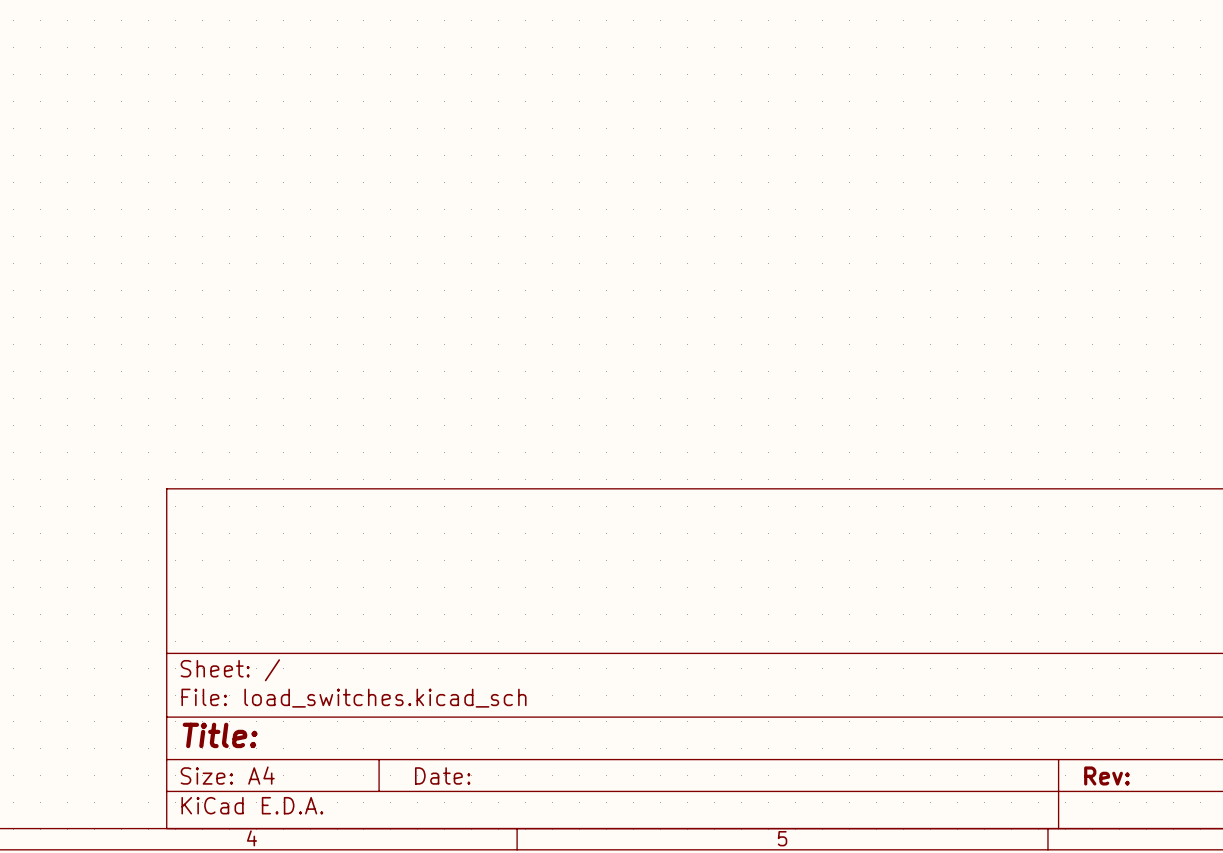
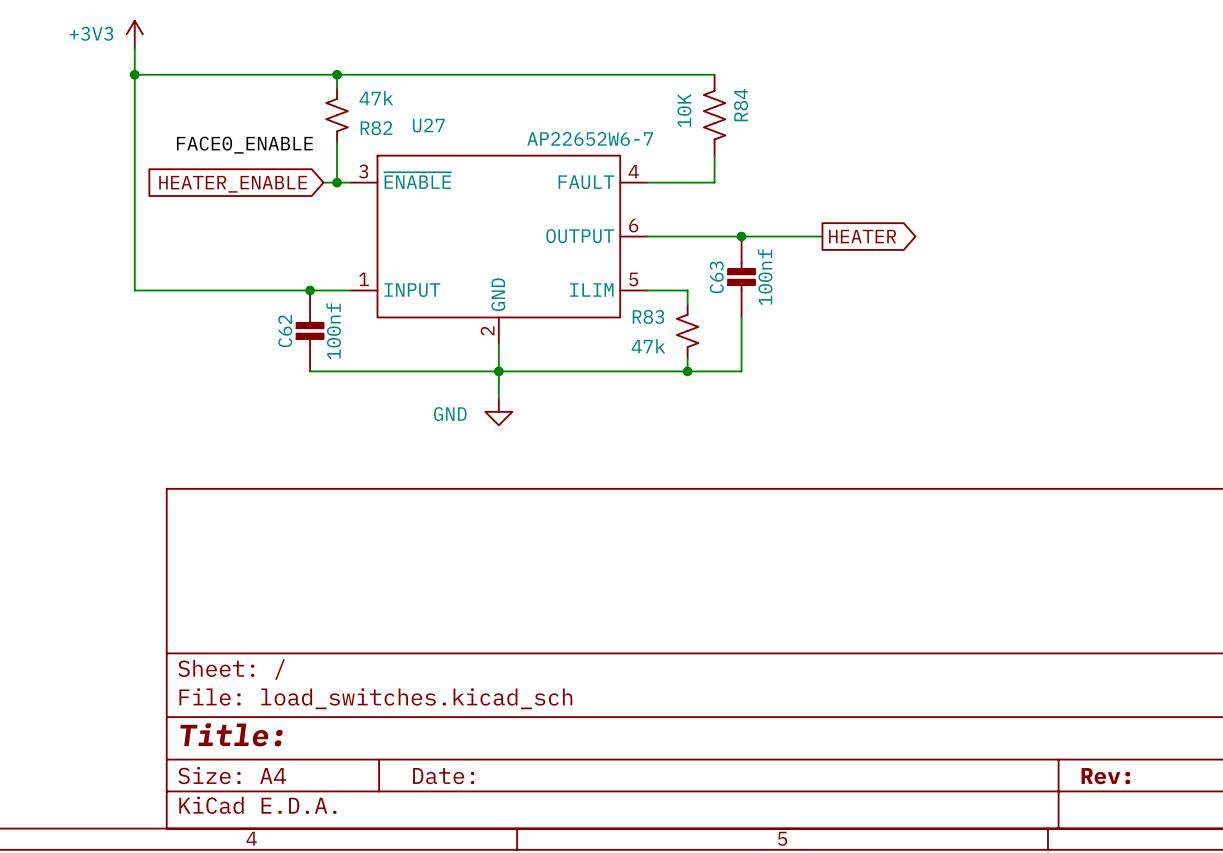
power symbol: none -> +3V3 (134, 34)
wire: none -> (134, 47) (134, 290) (350, 290)
wire: none -> (134, 74) (714, 74)
junction: none -> (134, 74)
wire: none -> (337, 74) (337, 88)
junction: none -> (337, 74)
R82: none -> 47k (337, 115)
R84: none -> 10K (714, 115)
wire: none -> (337, 142) (337, 182)
label: none -> FACE0_ENABLE (244, 145)
wire: none -> (714, 155) (714, 182) (647, 182)
wire: none -> (323, 182) (350, 182)
junction: none -> (337, 182)
global label: none -> HEATER_ENABLE (233, 184)
wire: none -> (647, 236) (822, 236)
junction: none -> (741, 236)
global label: none -> HEATER (862, 236)
U27: none -> AP22652W6-7 (498, 250)
C63: none -> 100nf (741, 277)
junction: none -> (310, 290)
wire: none -> (647, 290) (687, 290) (687, 303)
wire: none -> (741, 317) (741, 371) (310, 371)
C62: none -> 100nf (310, 330)
R83: none -> 47k (687, 330)
wire: none -> (498, 344) (498, 398)
wire: none -> (687, 357) (687, 371)
junction: none -> (498, 371)
junction: none -> (687, 371)
power symbol: none -> GND (498, 411)

